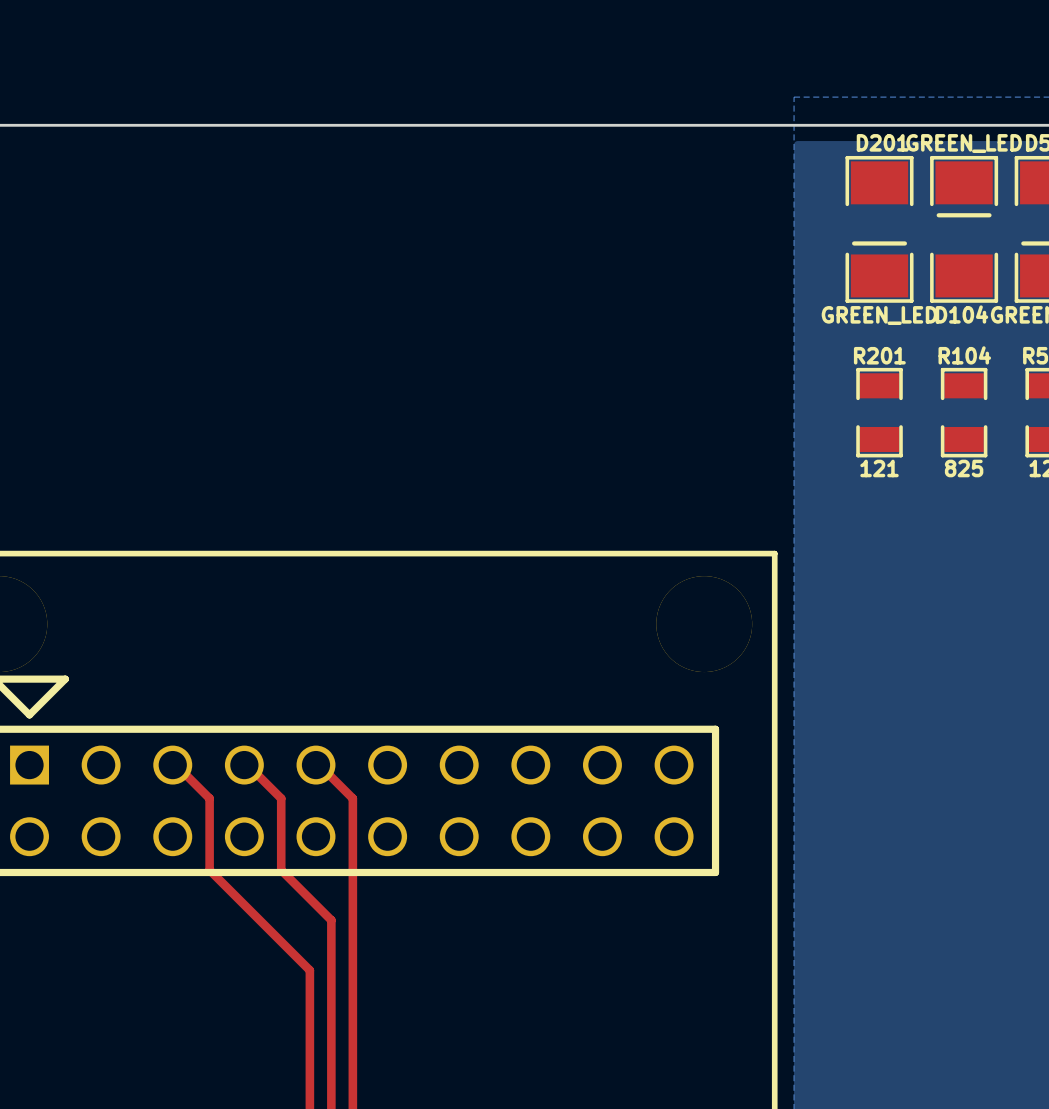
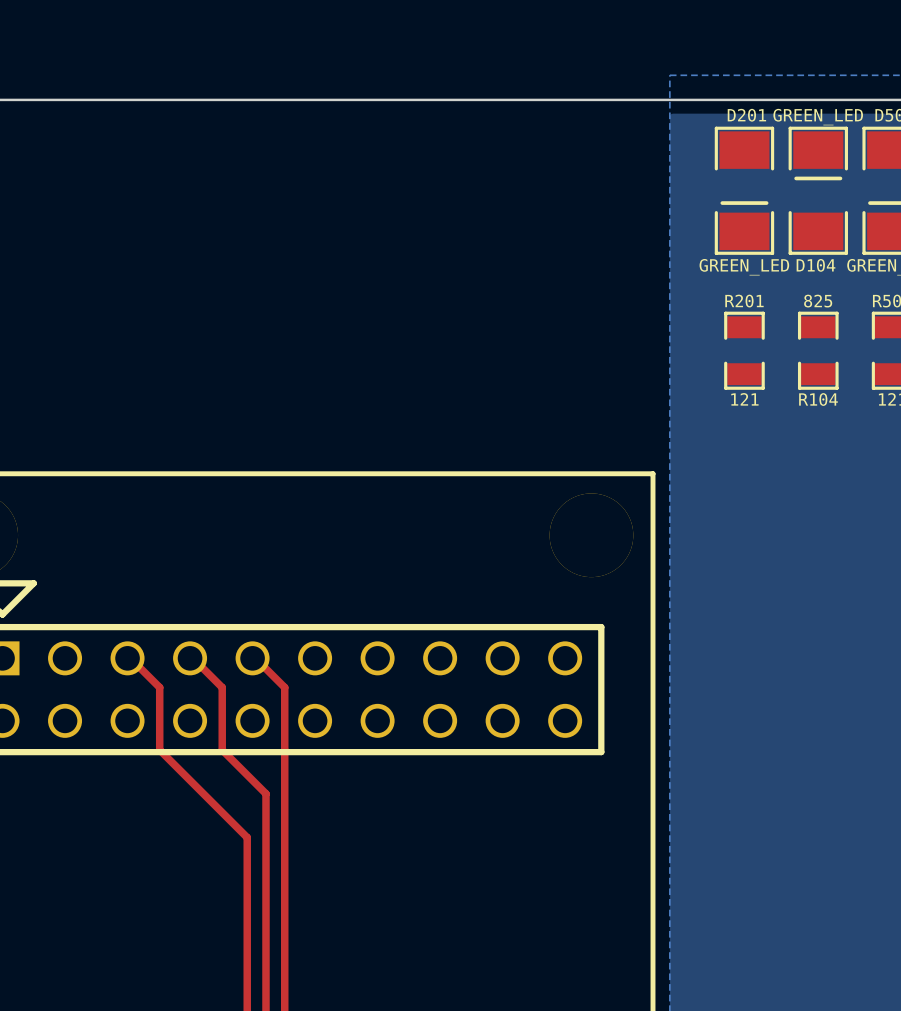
R104 name position: R104 (964, 355) -> R104 (818, 399)
R104 value position: 825 (964, 468) -> 825 (818, 301)

